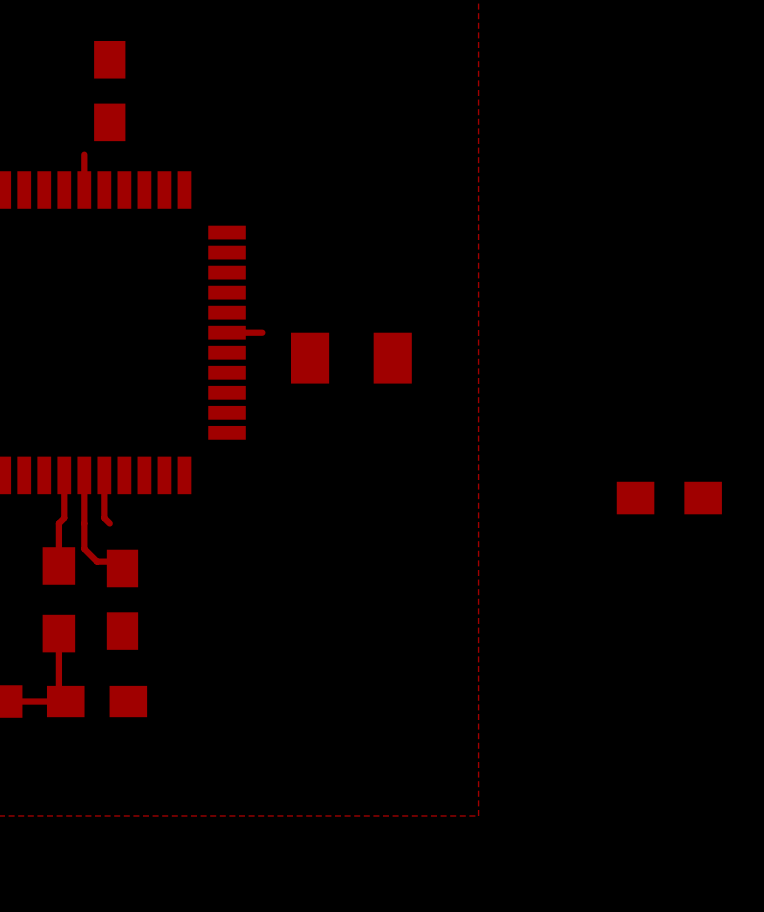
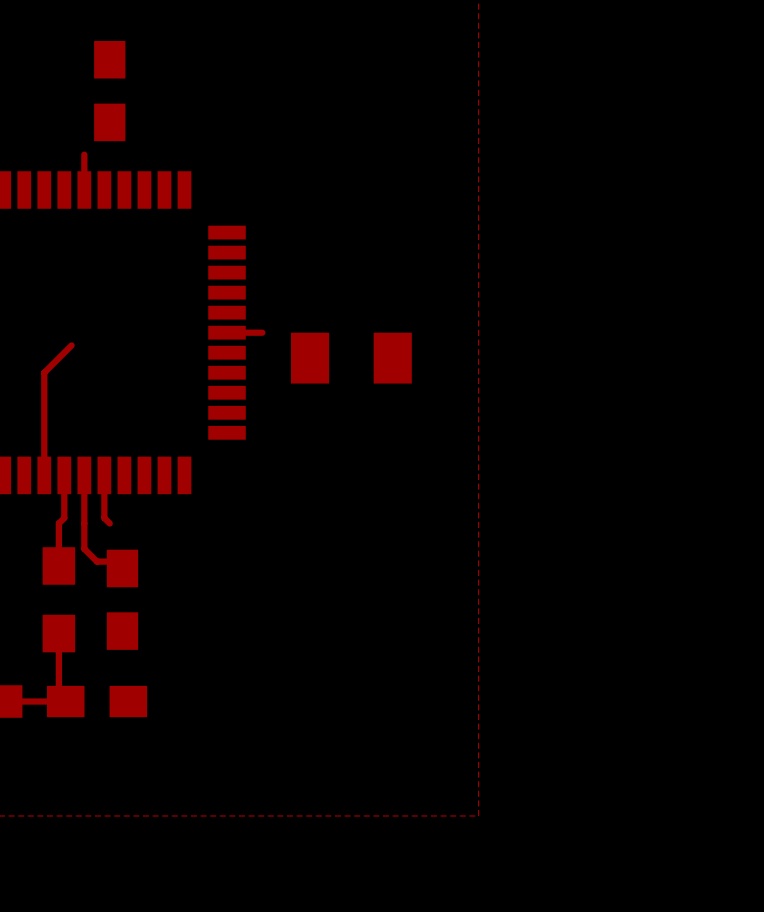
top track: none -> (71, 345) (44, 372) (44, 475)
part: (669, 498) -> none

